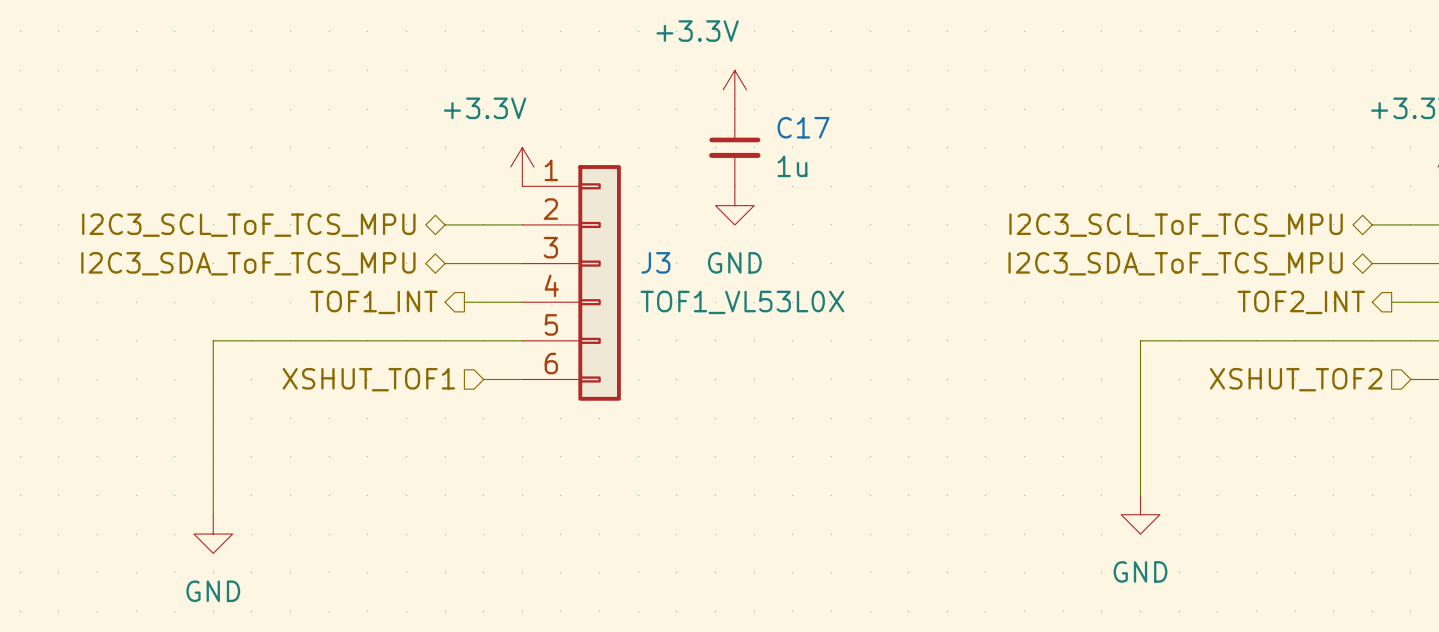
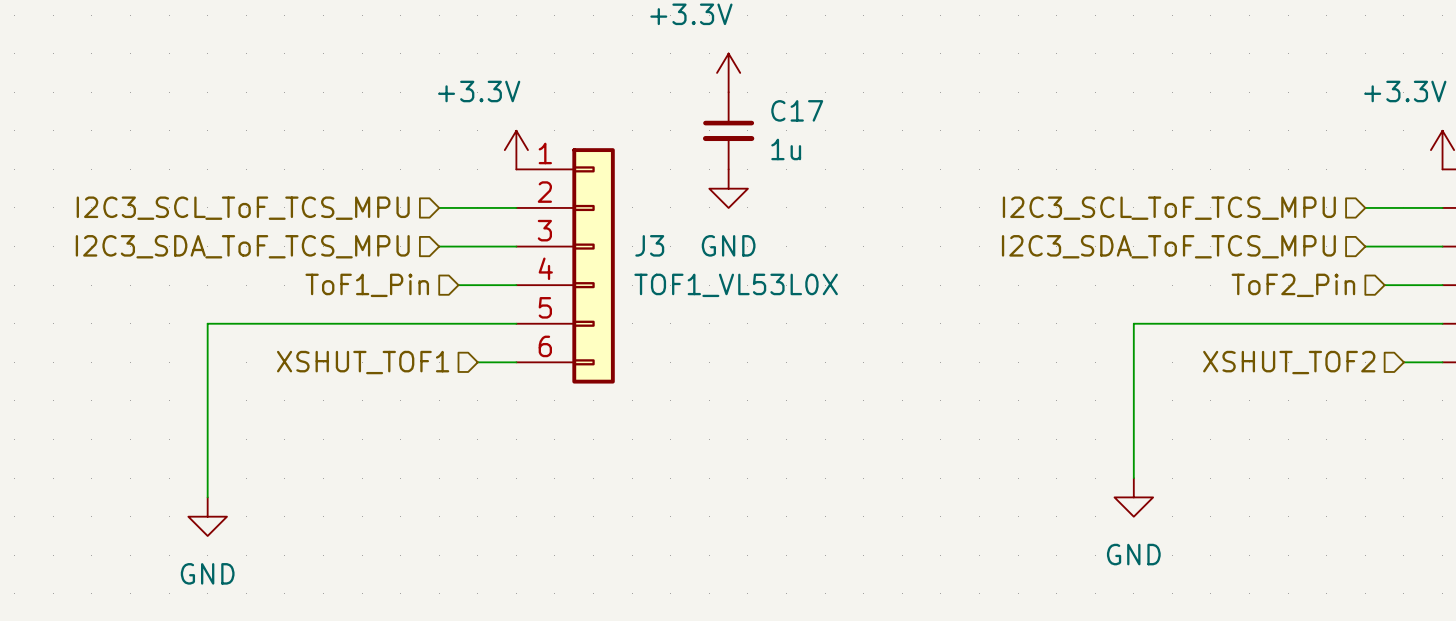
hierarchical label shape: bidirectional (248, 225) -> input (243, 208)
hierarchical label shape: bidirectional (1176, 225) -> input (1169, 208)
hierarchical label shape: bidirectional (248, 263) -> input (242, 246)
hierarchical label shape: bidirectional (1175, 263) -> input (1168, 246)
hierarchical label shape: output (373, 302) -> input (367, 285)
hierarchical label: TOF1_INT (373, 302) -> ToF1_Pin (367, 285)
hierarchical label shape: output (1301, 302) -> input (1293, 285)
hierarchical label: TOF2_INT (1301, 302) -> ToF2_Pin (1293, 285)

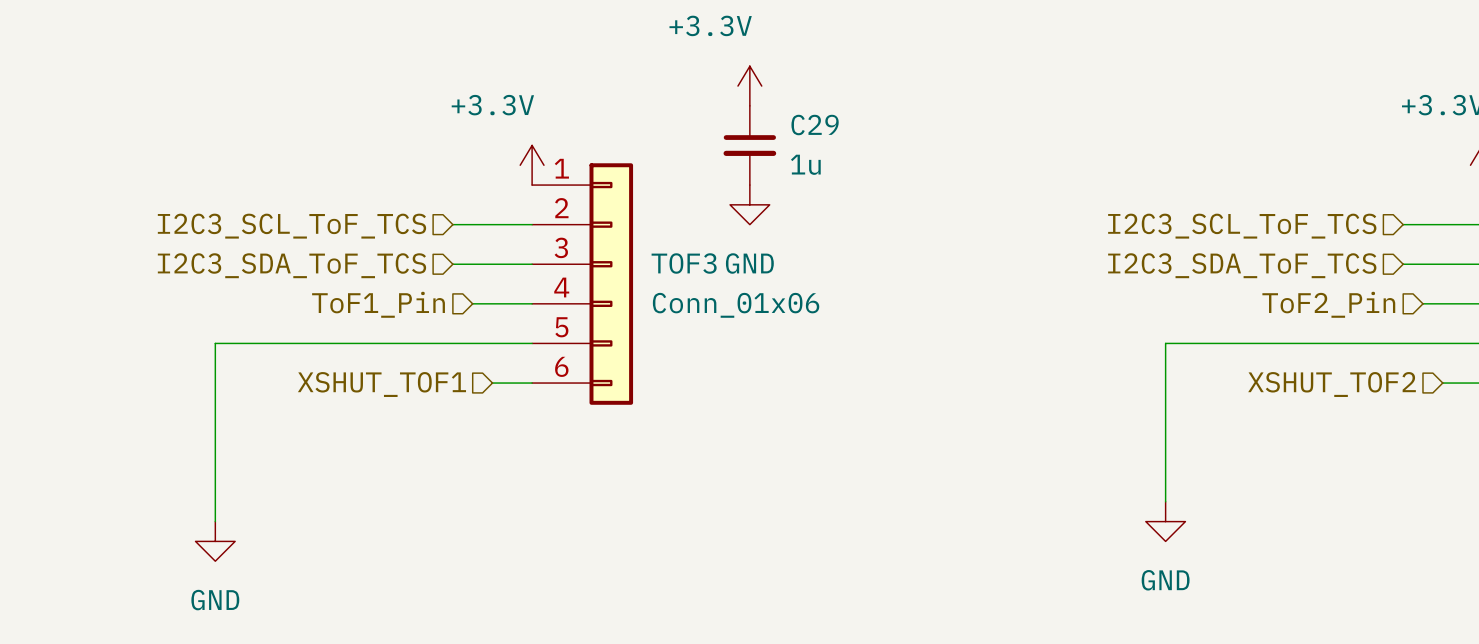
C17 name: C17 (797, 110) -> C29 (815, 125)
hierarchical label: I2C3_SCL_ToF_TCS_MPU (243, 208) -> I2C3_SCL_ToF_TCS (291, 226)
hierarchical label: I2C3_SCL_ToF_TCS_MPU (1169, 208) -> I2C3_SCL_ToF_TCS (1242, 226)
J3 name: J3 (649, 245) -> TOF3 (684, 263)
hierarchical label: I2C3_SDA_ToF_TCS_MPU (242, 246) -> I2C3_SDA_ToF_TCS (291, 265)
hierarchical label: I2C3_SDA_ToF_TCS_MPU (1168, 246) -> I2C3_SDA_ToF_TCS (1242, 265)
J3 value: TOF1_VL53L0X (736, 285) -> Conn_01x06 (736, 305)

